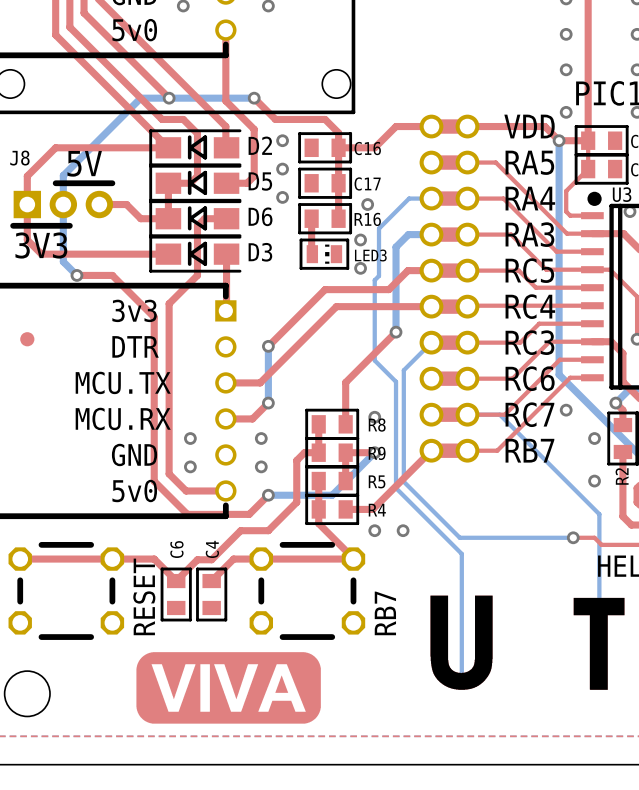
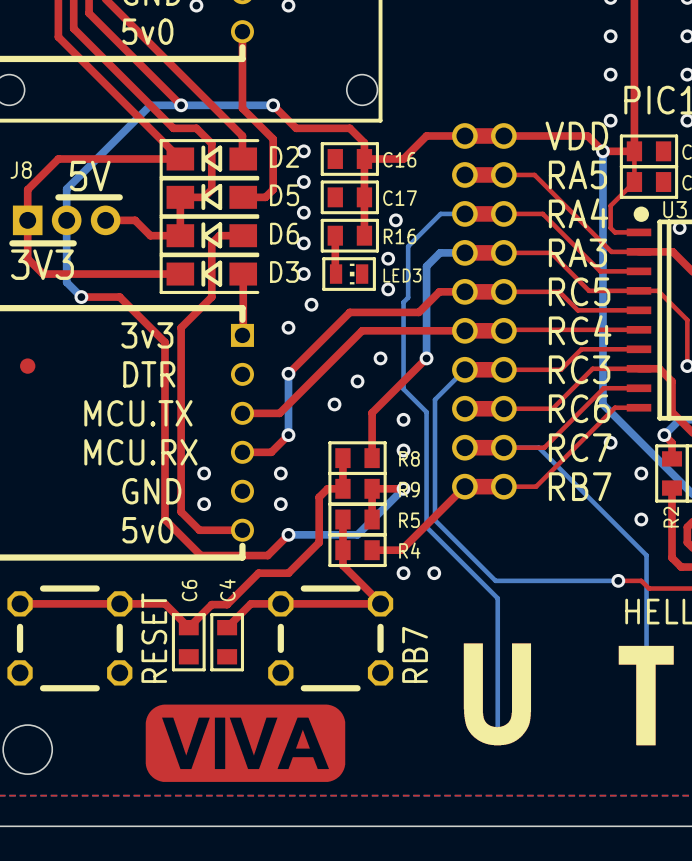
via: none -> (303, 243)
via: none -> (303, 274)
via: none -> (311, 304)
via: none -> (288, 327)
via: none -> (380, 358)
via: none -> (357, 381)
via: none -> (334, 404)
via: none -> (403, 419)

